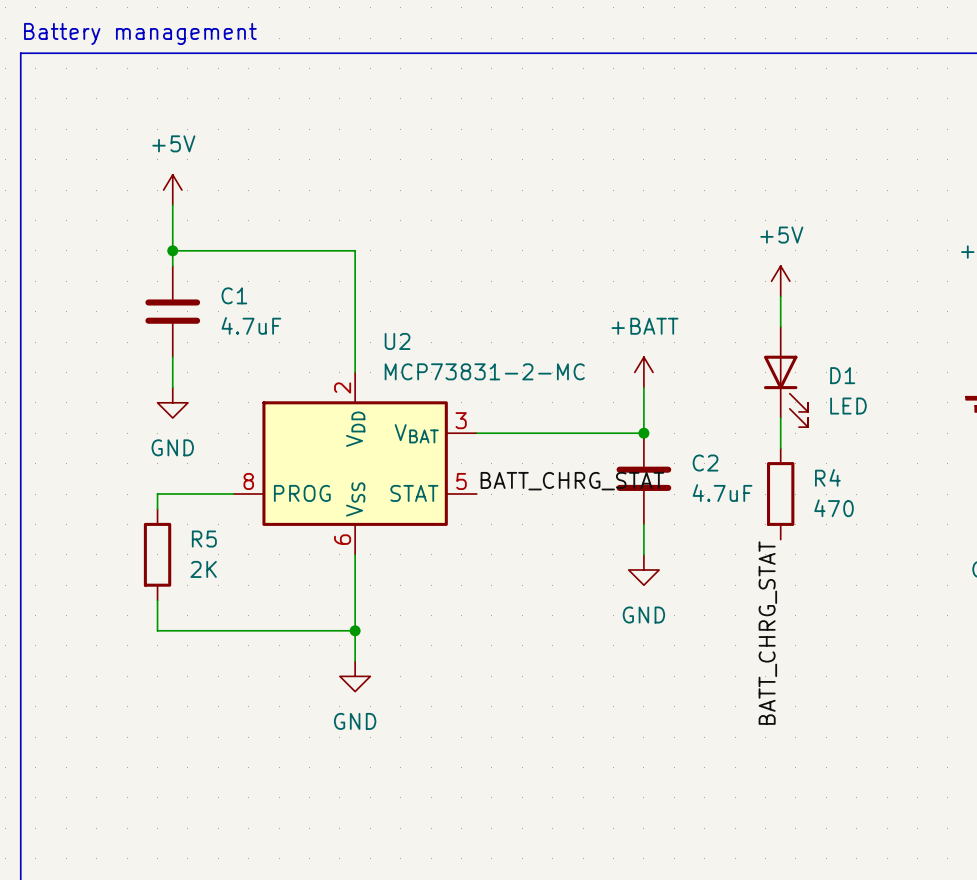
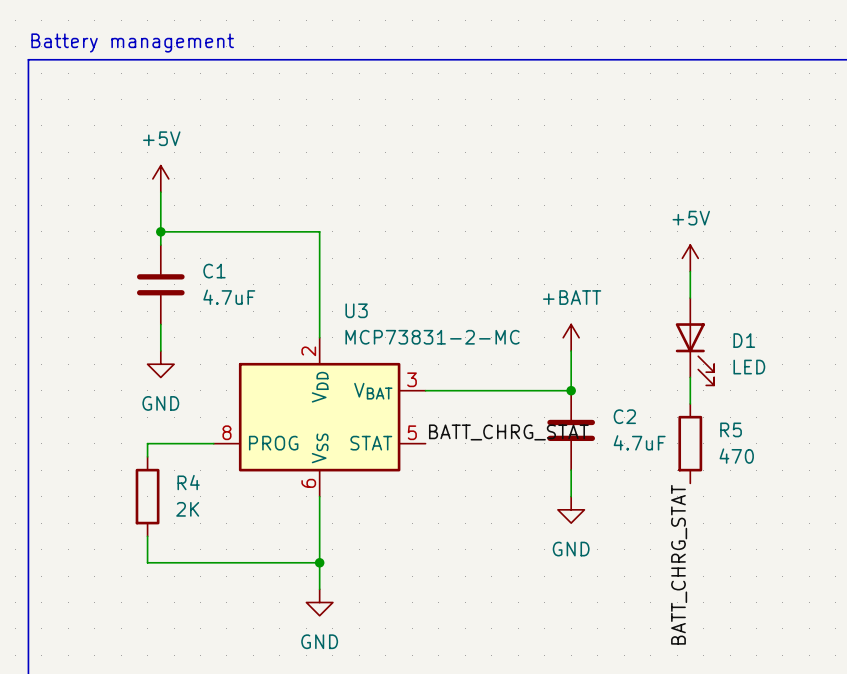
U2 name: U2 (397, 341) -> U3 (356, 310)
R4 name: R4 (827, 477) -> R5 (731, 429)
R5 name: R5 (204, 539) -> R4 (188, 482)

